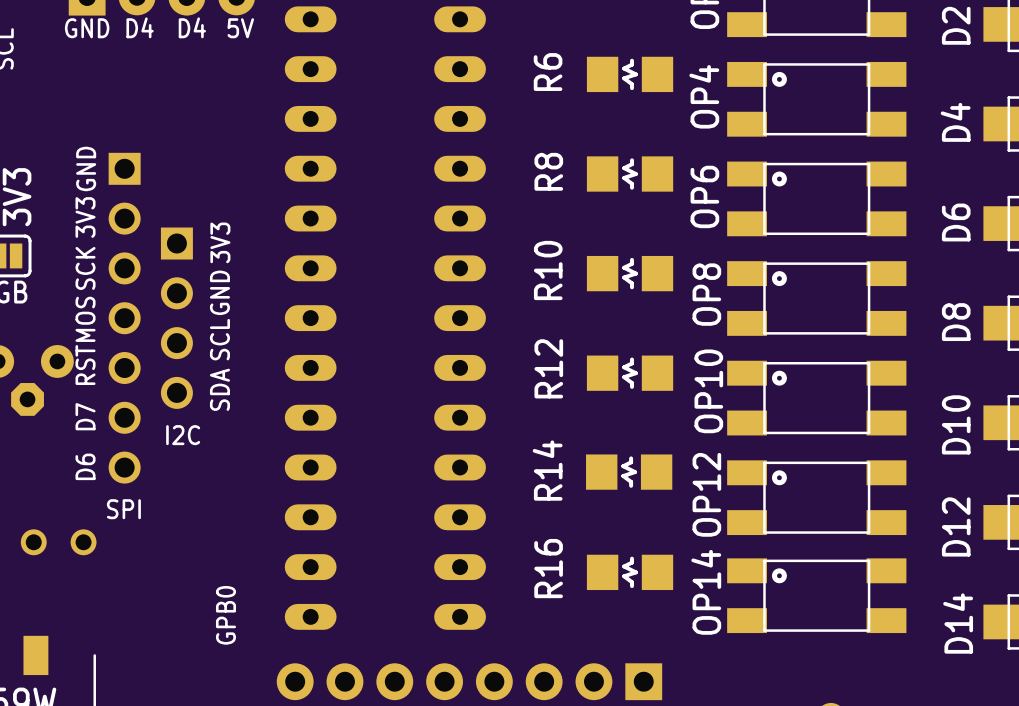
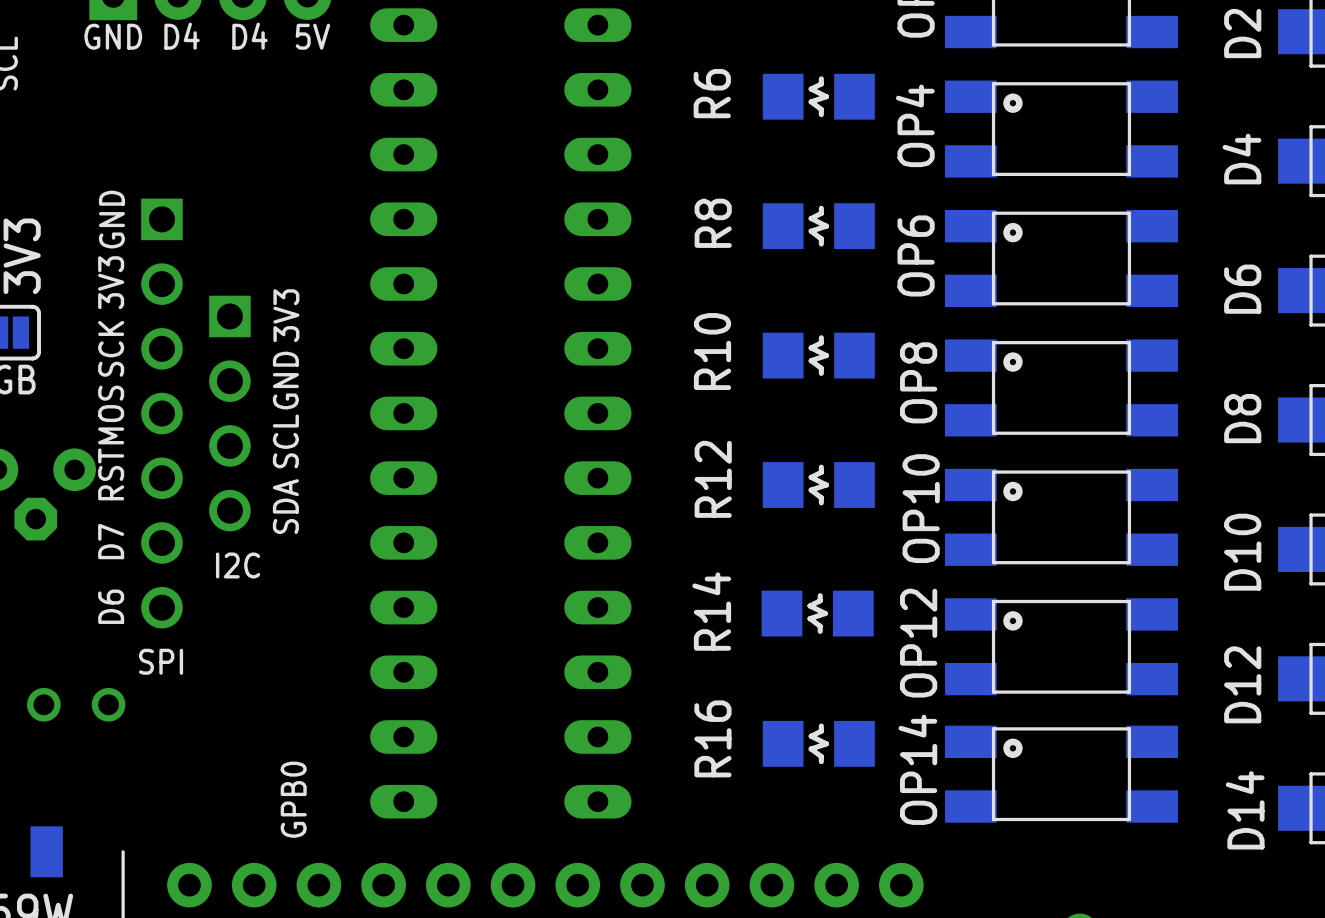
part: none -> (545, 885)
part: (469, 681) -> none

